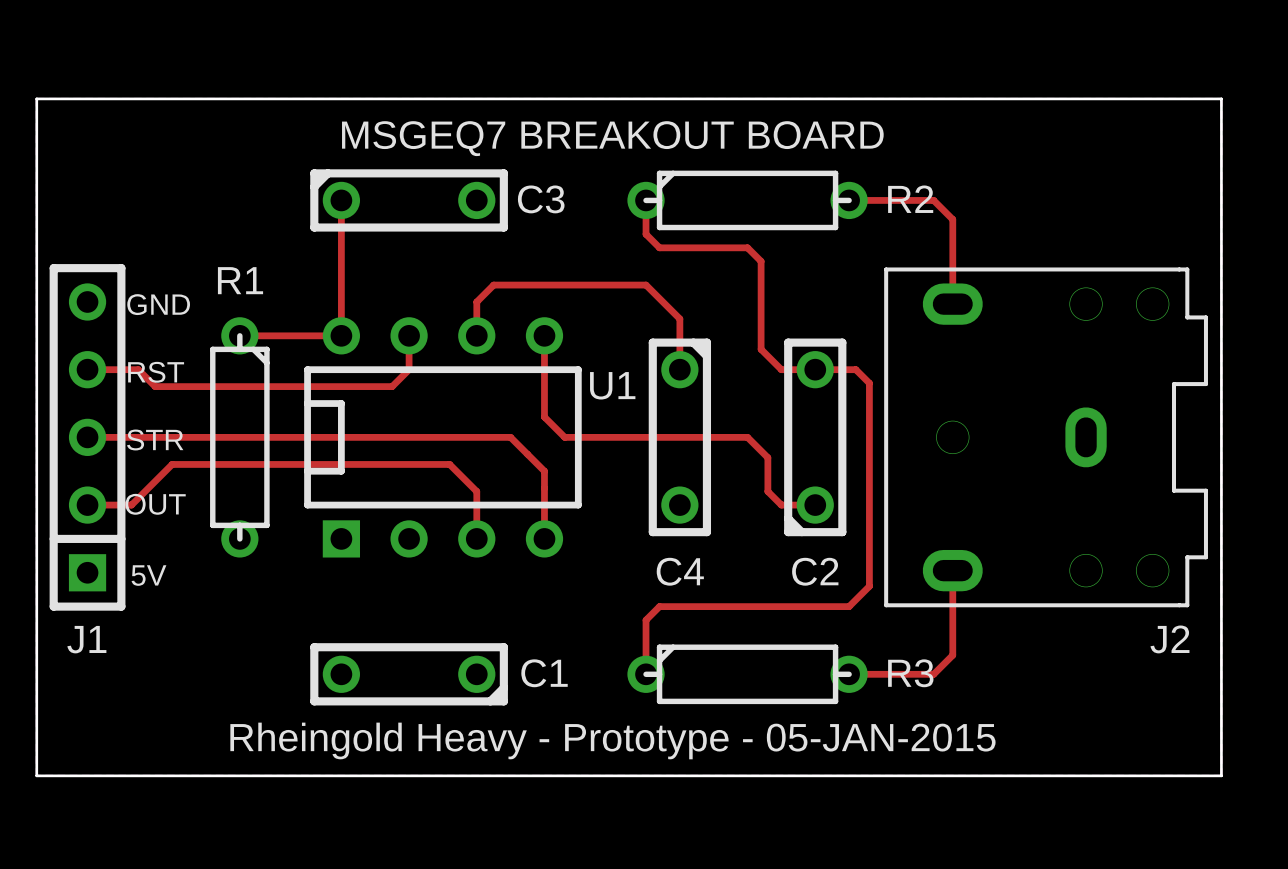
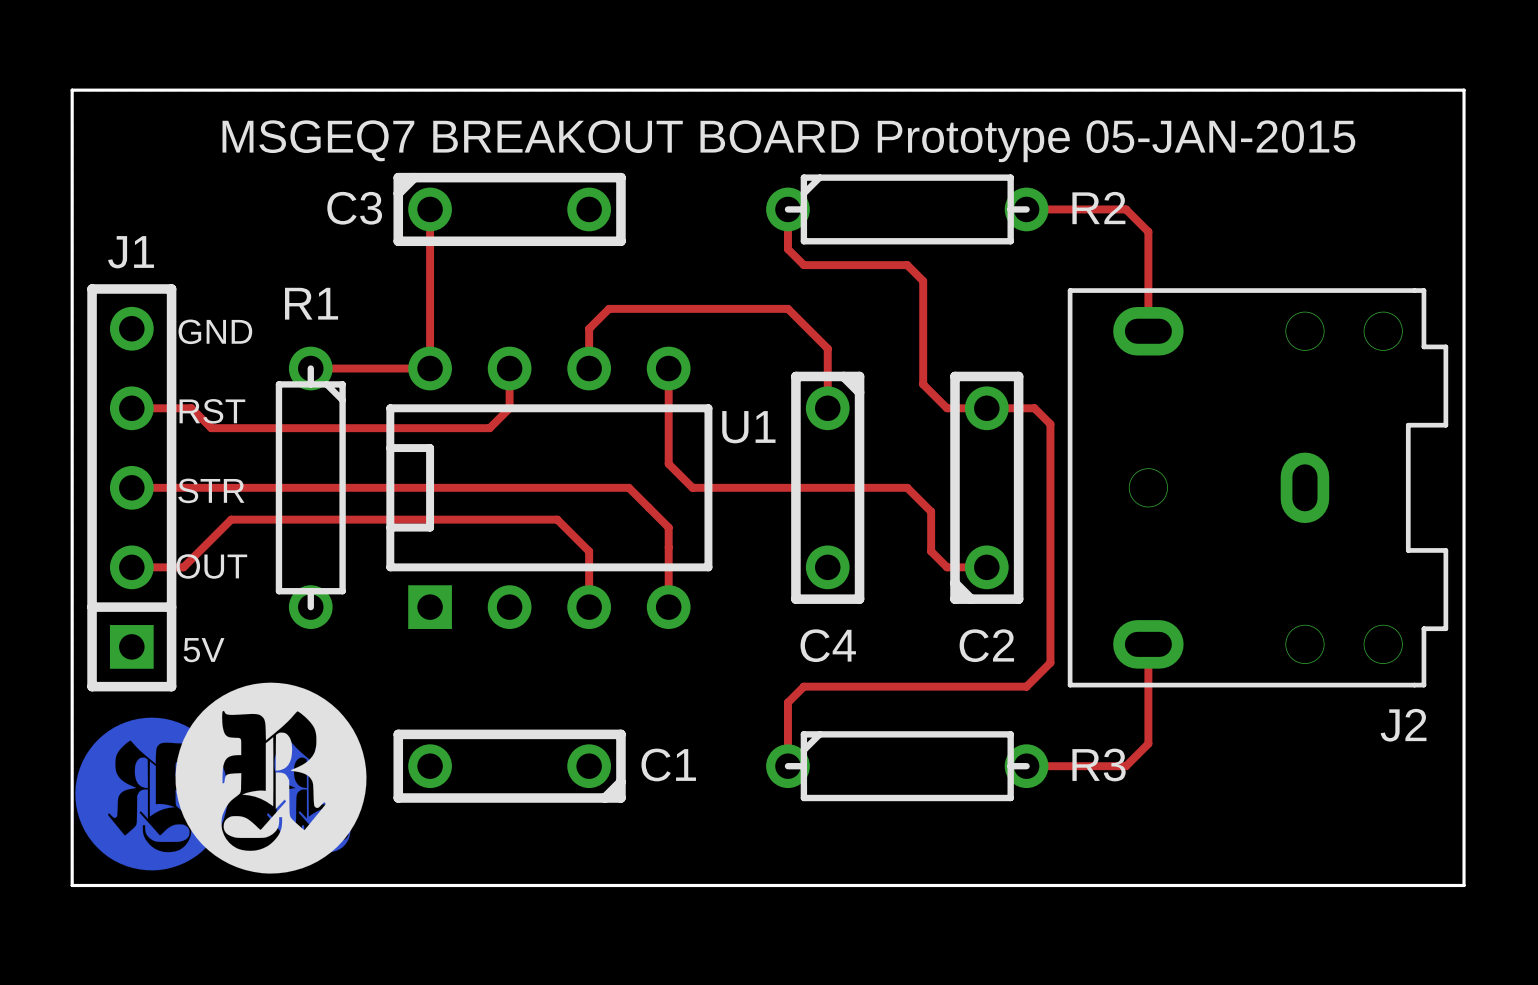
text: MSGEQ7 BREAKOUT BOARD (612, 138) -> MSGEQ7 BREAKOUT BOARD Prototype 05-JAN-2015 (788, 141)
C3 name position: C3 (541, 199) -> C3 (354, 208)
drawing: none -> [75, 682, 367, 874]
J1 name position: J1 (86, 639) -> J1 (131, 252)
text: Rheingold Heavy - Prototype - 05-JAN-2015 (612, 740) -> none

